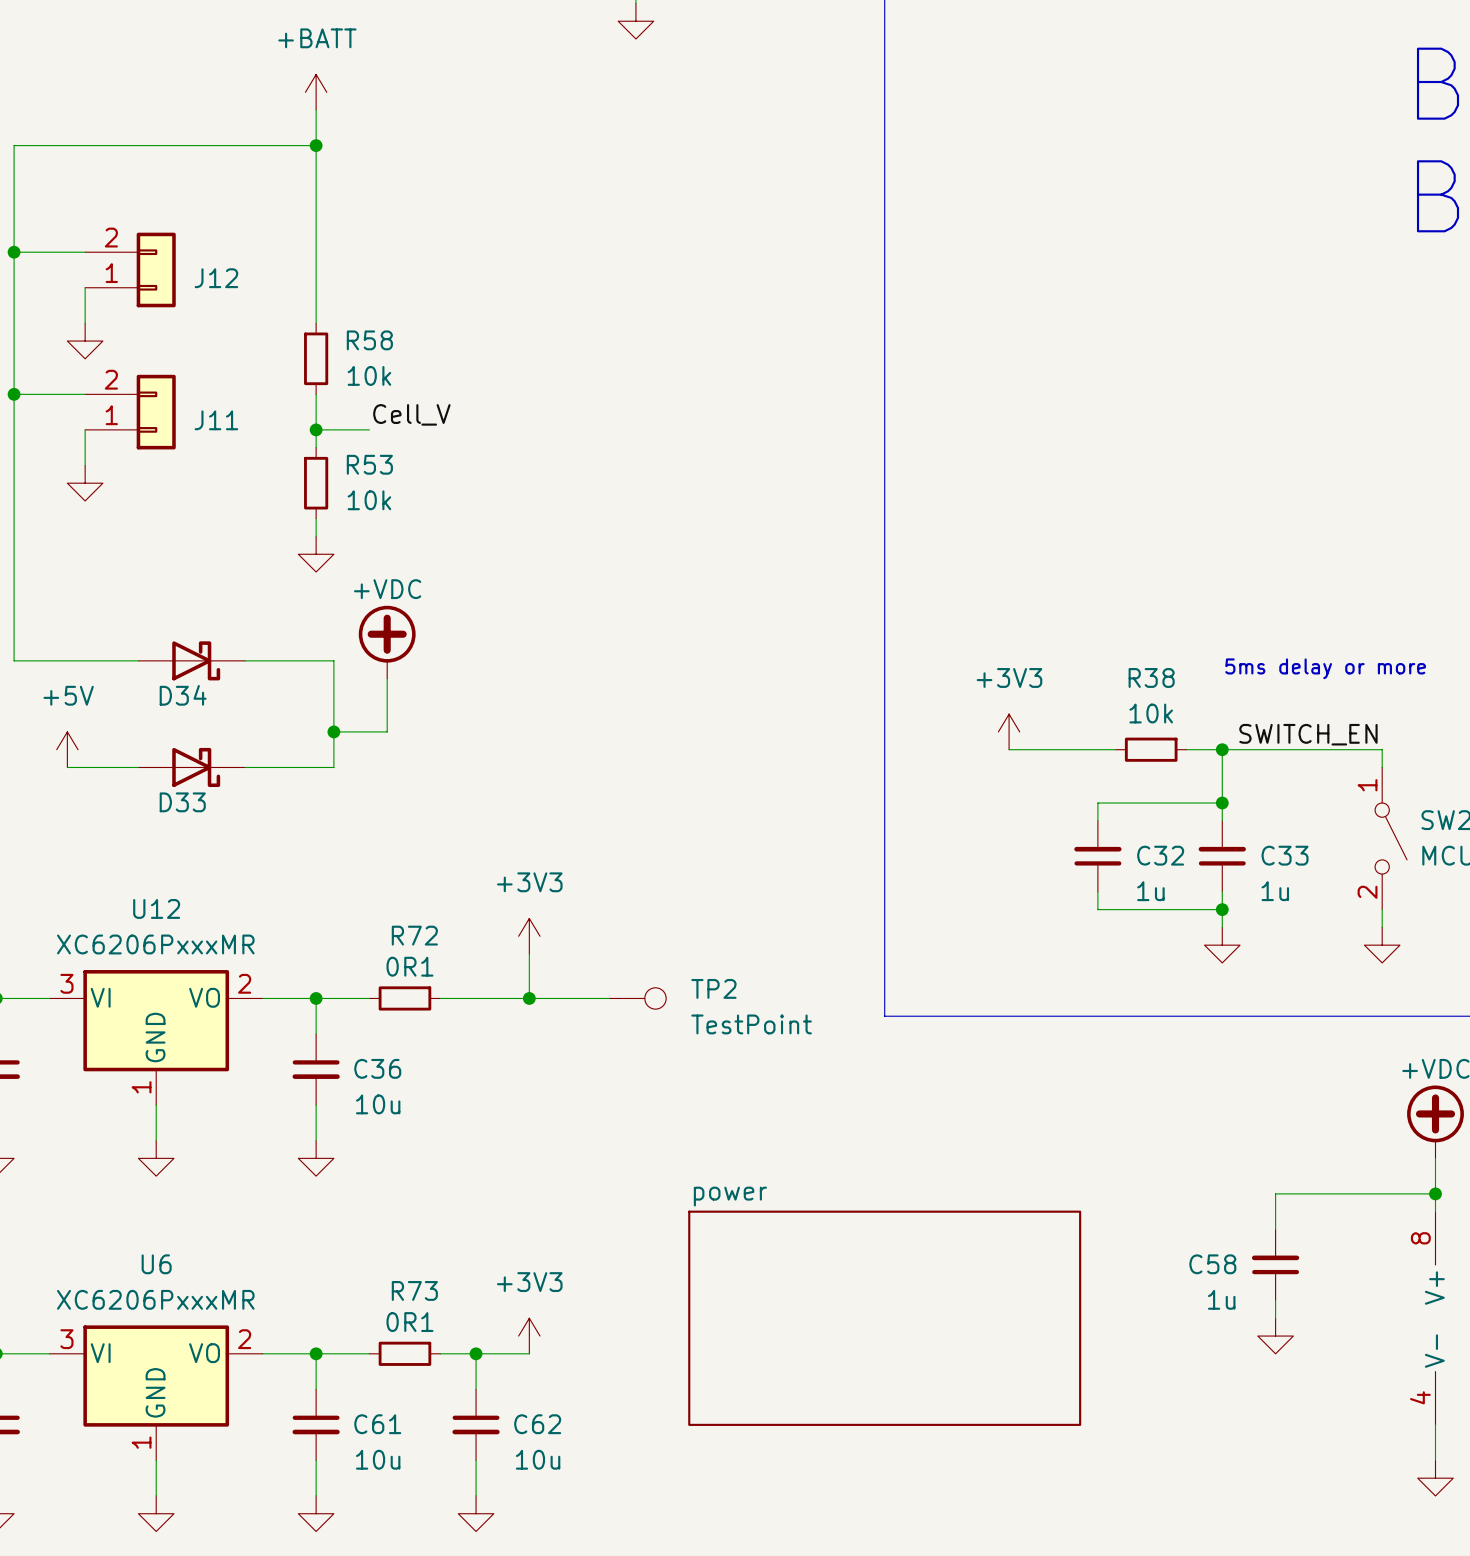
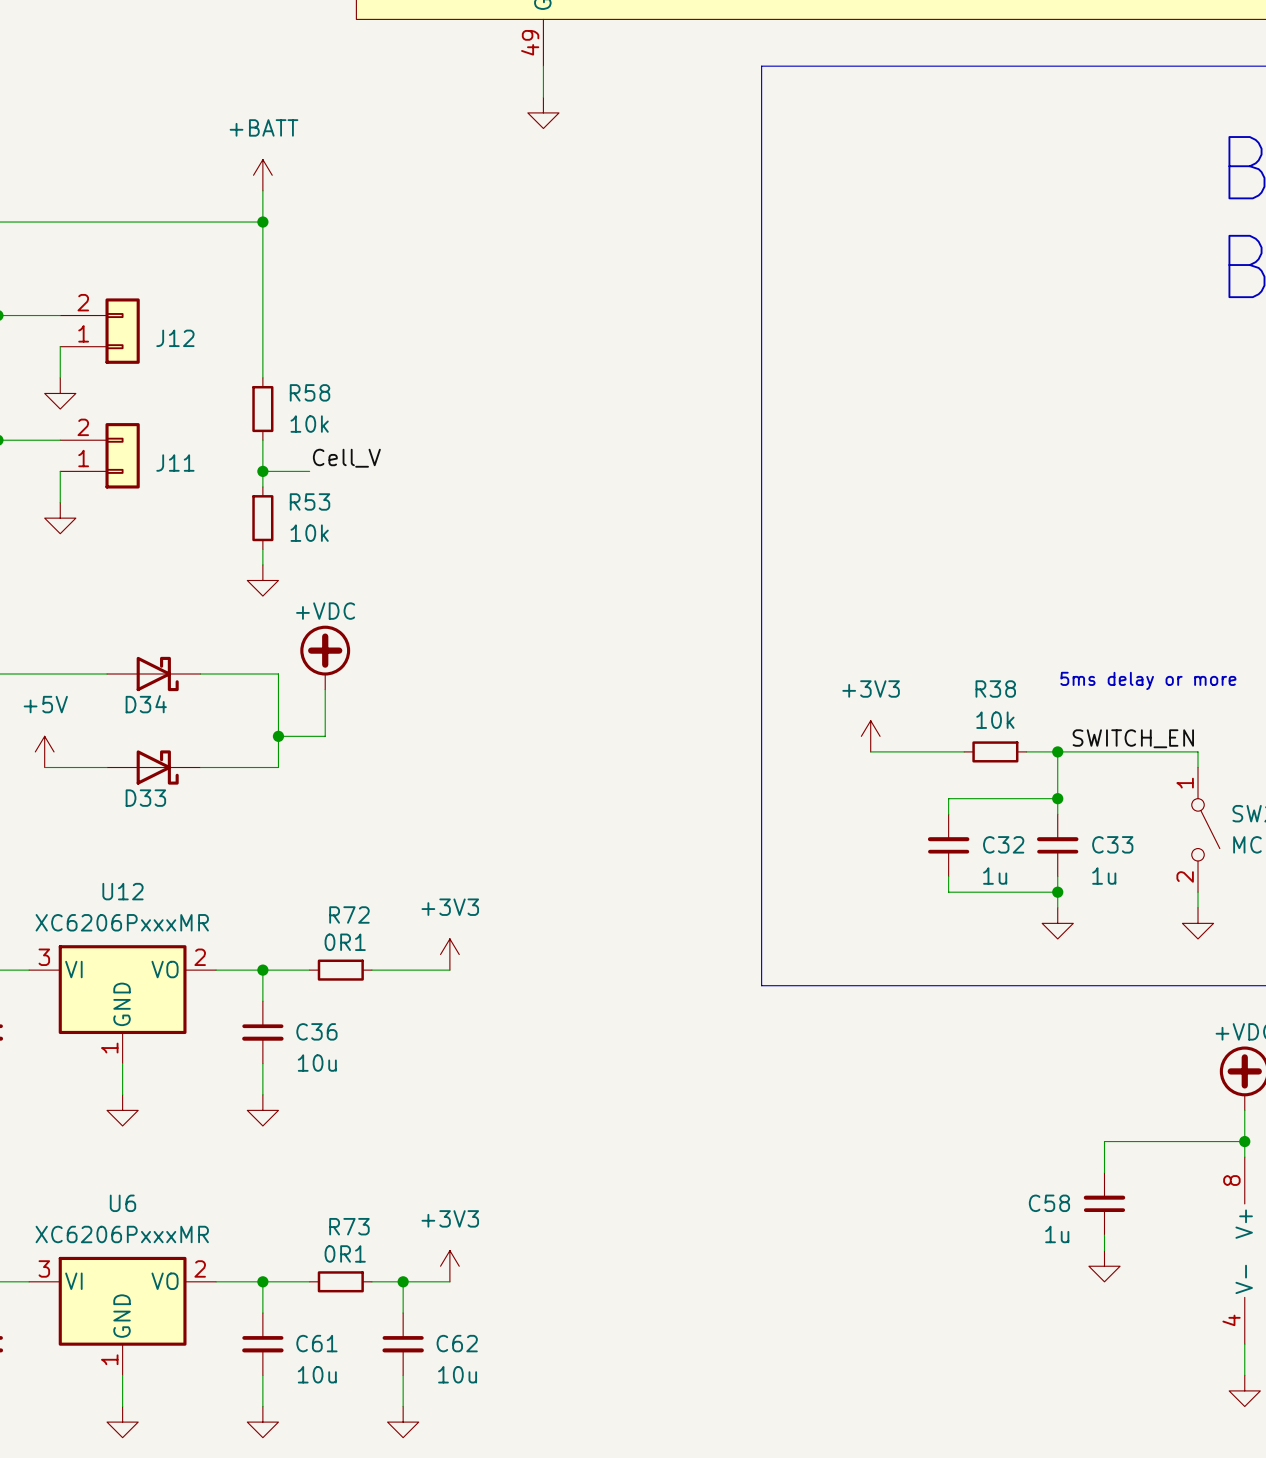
power symbol position: +3V3 (529, 936) -> +3V3 (449, 954)
wire: (529, 954) (529, 998) (609, 998) -> none
junction: (529, 998) -> none
TP2: TestPoint (637, 998) -> none
sheet power: (884, 1318) -> none

